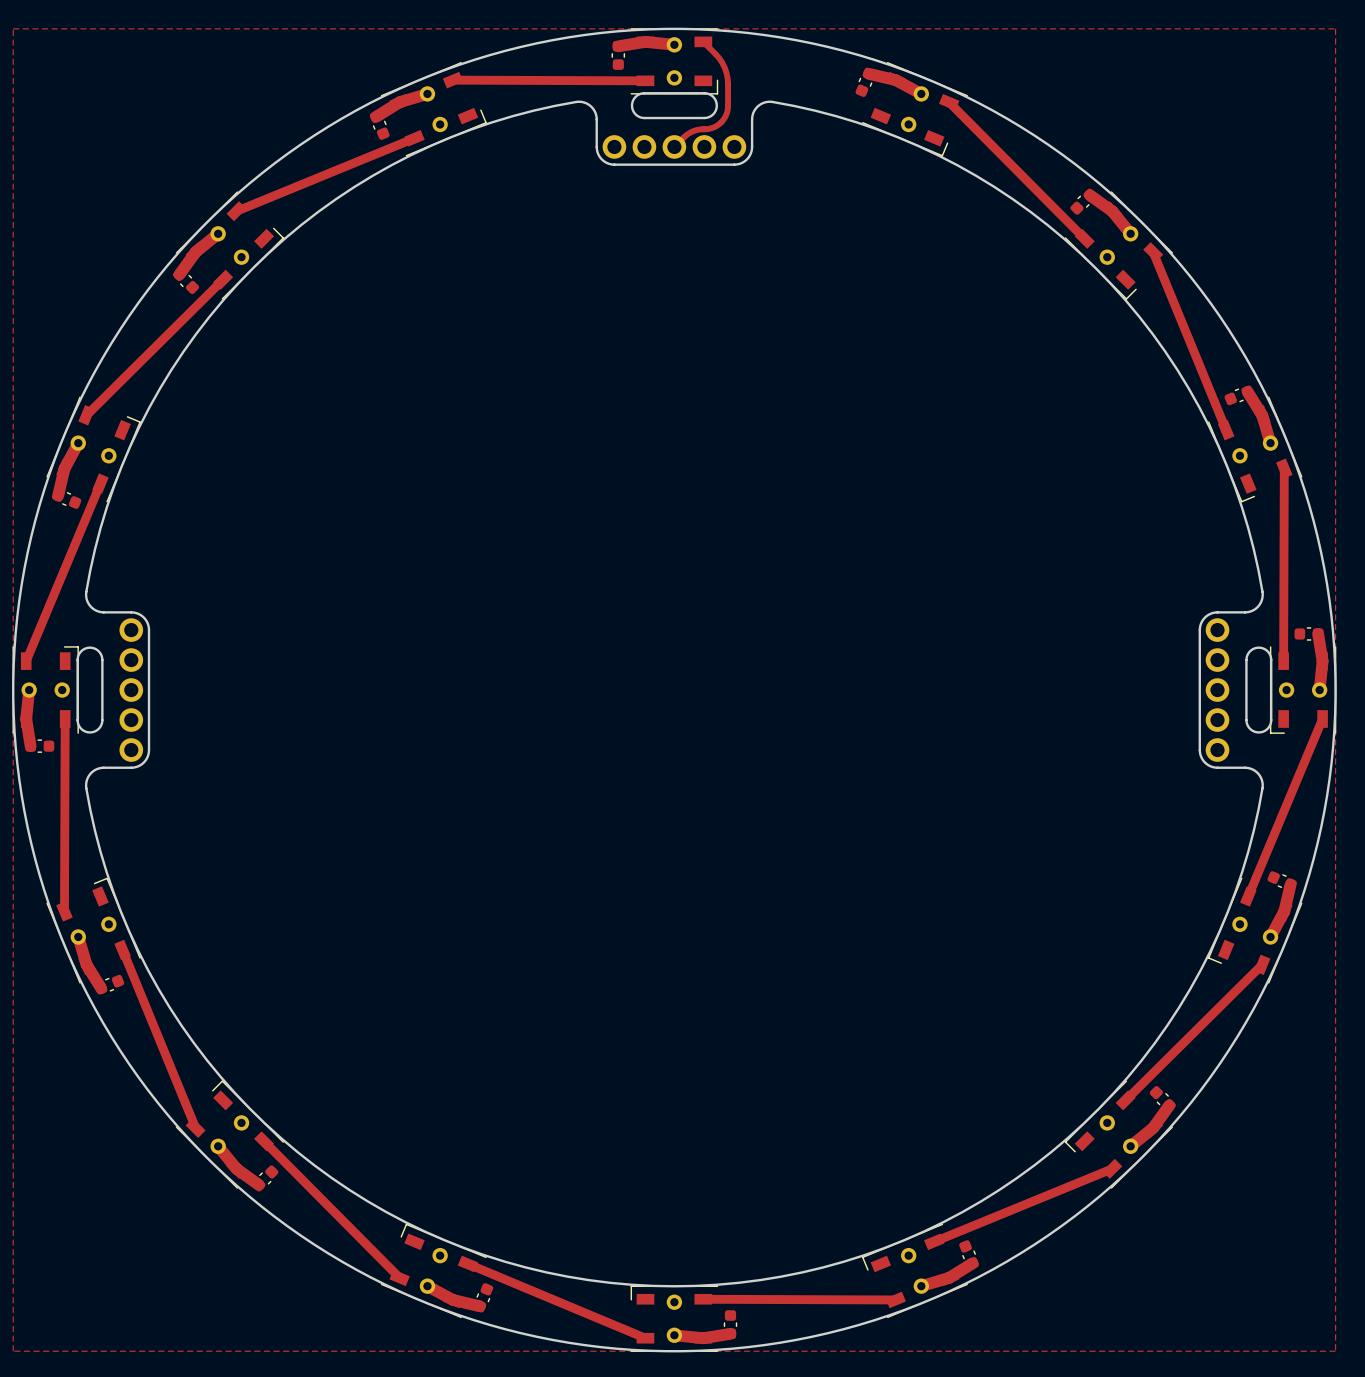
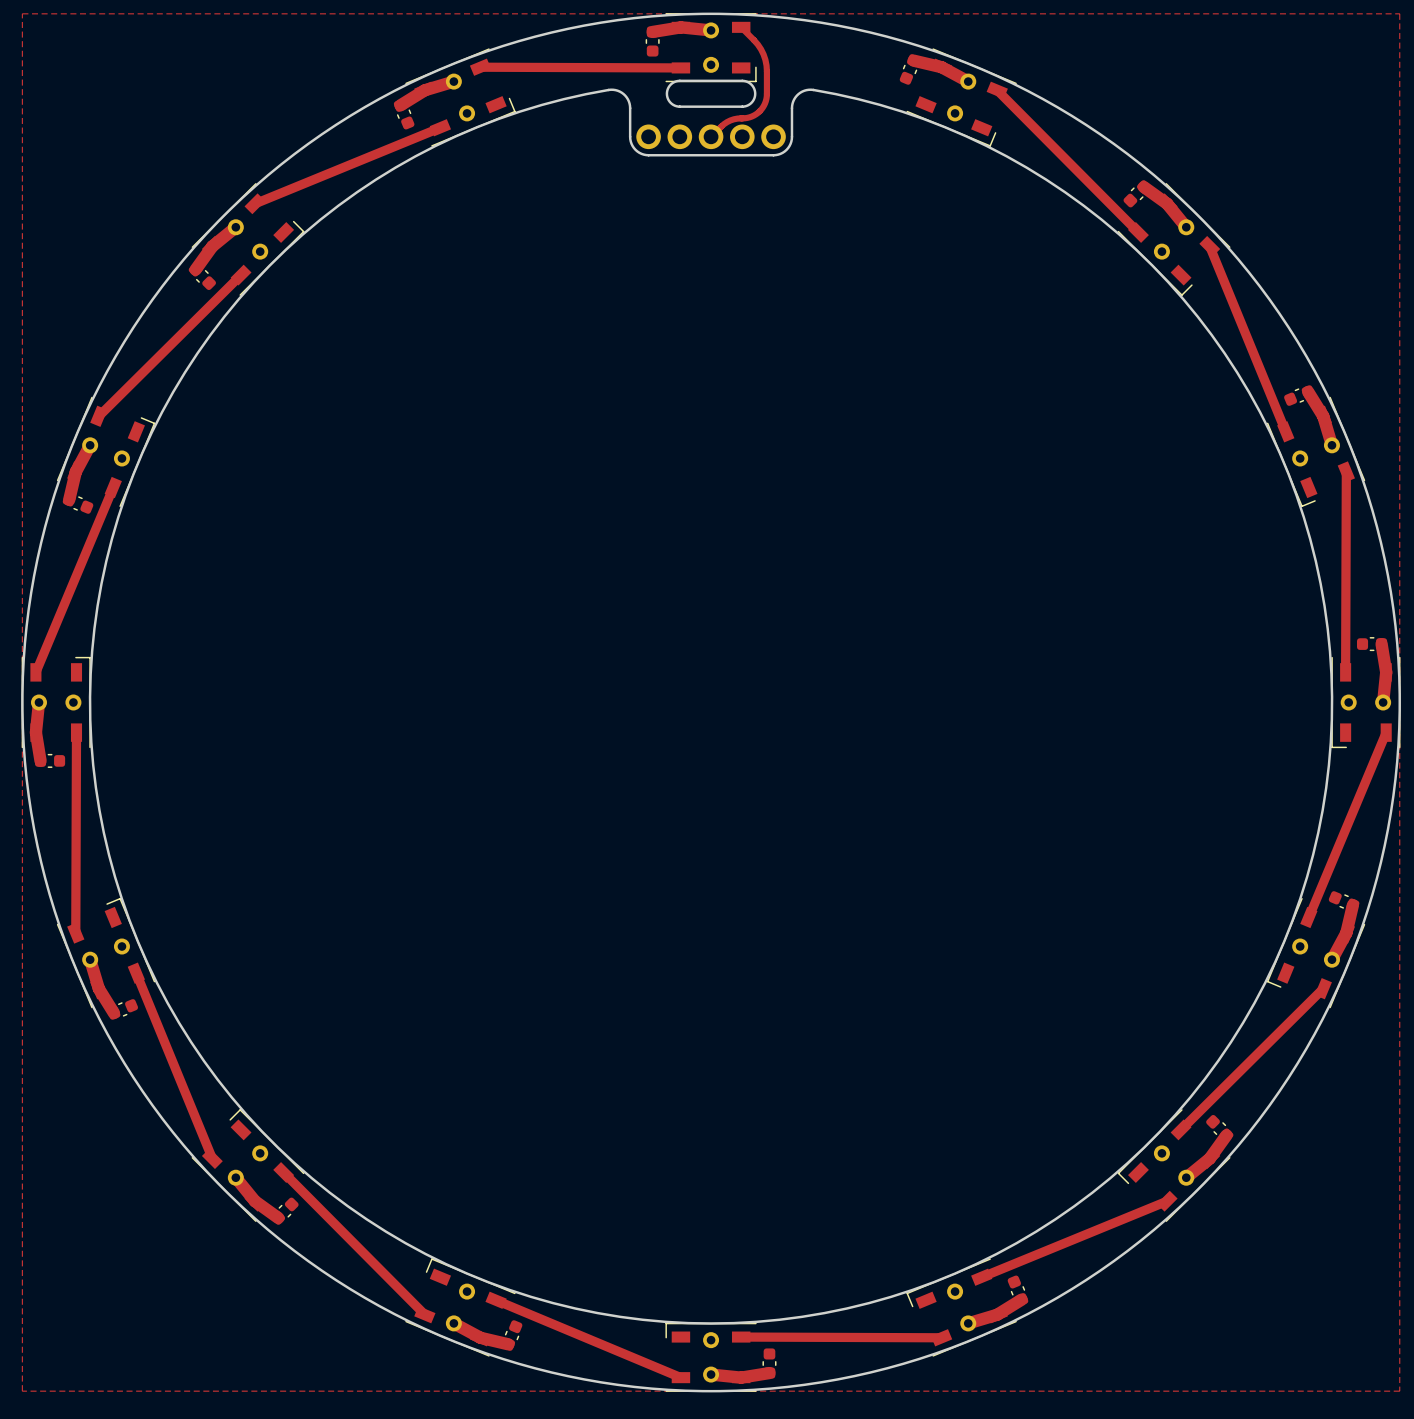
board edge: (576, 101) (512, 116) (471, 129) (411, 155) (372, 175) (318, 211) (284, 238) (237, 284) (196, 334) (171, 369) (149, 407) (121, 466) (100, 528) (86, 591) (87, 602) (95, 610) (101, 612) (135, 612) (142, 616) (148, 624) (148, 754) (143, 762) (135, 767) (101, 767) (95, 769) (88, 775) (86, 786) (94, 830) (106, 871) (129, 932) (148, 970) (181, 1025) (207, 1060) (234, 1093) (280, 1138) (314, 1165) (367, 1201) (424, 1231) (464, 1248) (525, 1267) (567, 1276) (610, 1282) (674, 1286) (717, 1284) (781, 1276) (823, 1267) (884, 1248) (943, 1222) (981, 1201) (1017, 1177) (1067, 1138) (1113, 1093) (1141, 1060) (1178, 1007) (1200, 970) (1227, 912) (1242, 871) (1253, 830) (1262, 786) (1259, 775) (1253, 769) (1247, 767) (1212, 767) (1204, 762) (1200, 754) (1201, 623) (1206, 616) (1212, 612) (1247, 612) (1253, 610) (1260, 602) (1262, 591) (1248, 528) (1227, 466) (1209, 426) (1188, 388) (1152, 334) (1111, 284) (1064, 238) (1030, 211) (975, 175) (937, 155) (877, 129) (836, 116) (772, 101) -> (608, 89) (541, 104) (498, 118) (456, 136) (395, 167) (357, 192) (303, 234) (269, 265) (224, 316) (184, 372) (162, 412) (142, 453) (118, 517) (106, 561) (94, 628) (90, 674) (91, 742) (99, 810) (109, 855) (121, 898) (147, 962) (179, 1022) (204, 1061) (246, 1114) (278, 1147) (311, 1178) (366, 1219) (425, 1254) (487, 1282) (553, 1303) (597, 1313) (642, 1319) (711, 1323) (779, 1319) (824, 1313) (890, 1296) (934, 1282) (996, 1254) (1036, 1231) (1074, 1206) (1127, 1163) (1160, 1131) (1204, 1079) (1230, 1042) (1265, 982) (1292, 920) (1313, 855) (1326, 787) (1330, 742) (1331, 674) (1327, 628) (1320, 583) (1303, 517) (1279, 453) (1260, 412) (1224, 353) (1197, 316) (1152, 265) (1119, 234) (1083, 205) (1026, 167) (986, 145) (923, 118) (858, 99) (813, 89)
board edge: (77, 660) (77, 723) (82, 730) (92, 732) (99, 728) (102, 721) (102, 657) (97, 649) (88, 647) (80, 651) (77, 660) -> none
board edge: (1246, 660) (1246, 723) (1253, 731) (1261, 732) (1268, 728) (1271, 721) (1270, 657) (1265, 649) (1257, 647) (1249, 651) (1246, 660) -> none
part: (131, 690) -> none
part: (1217, 690) -> none

